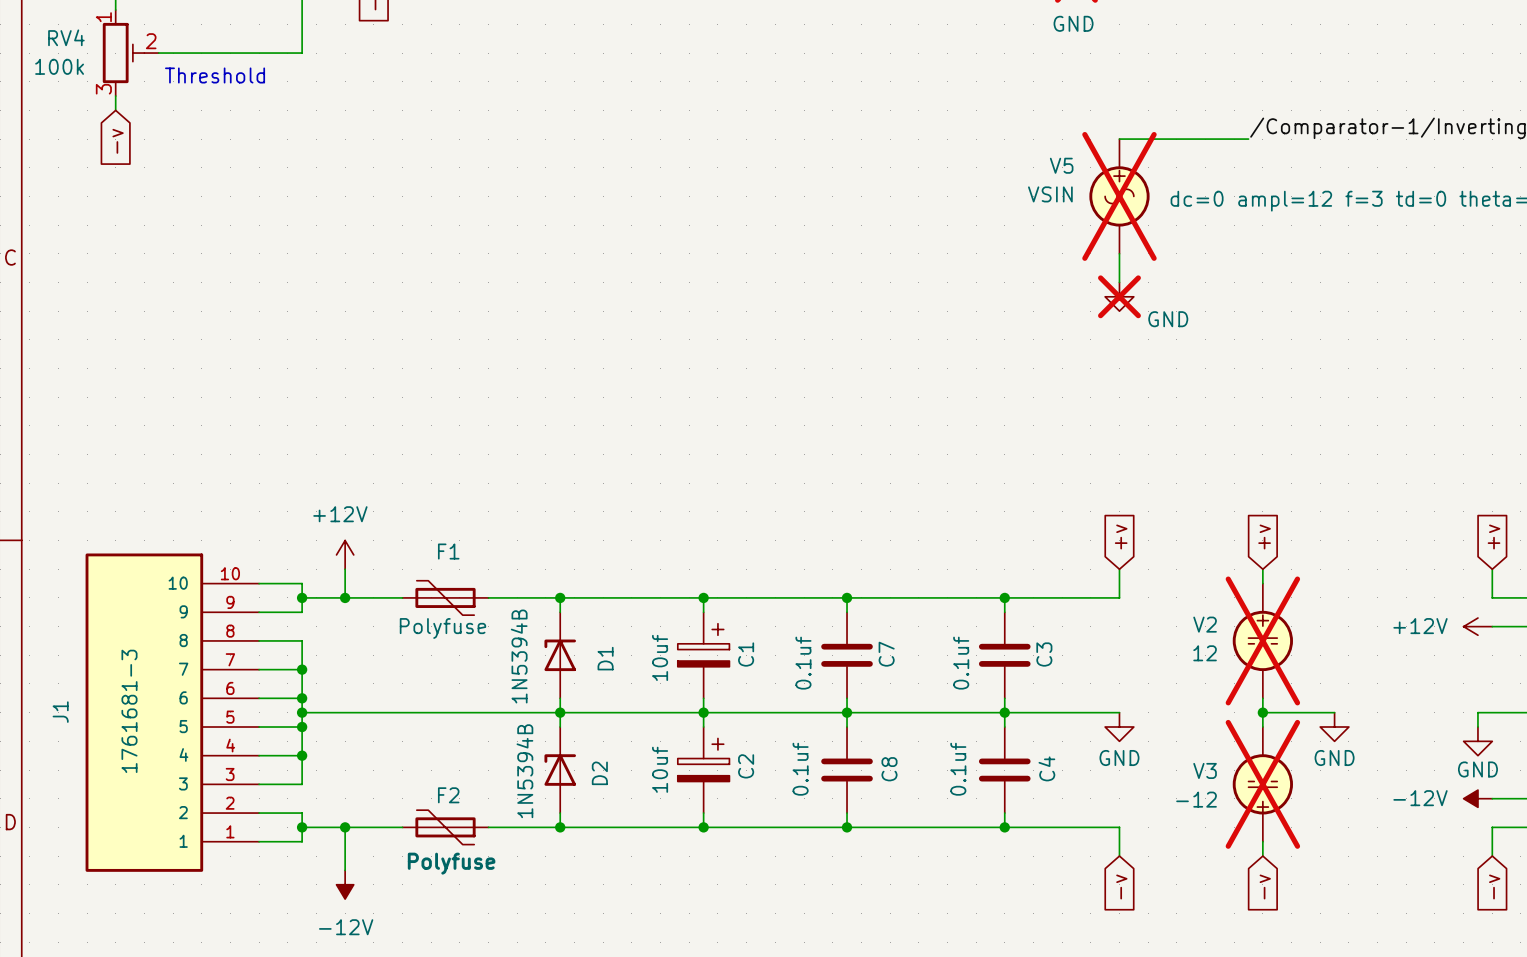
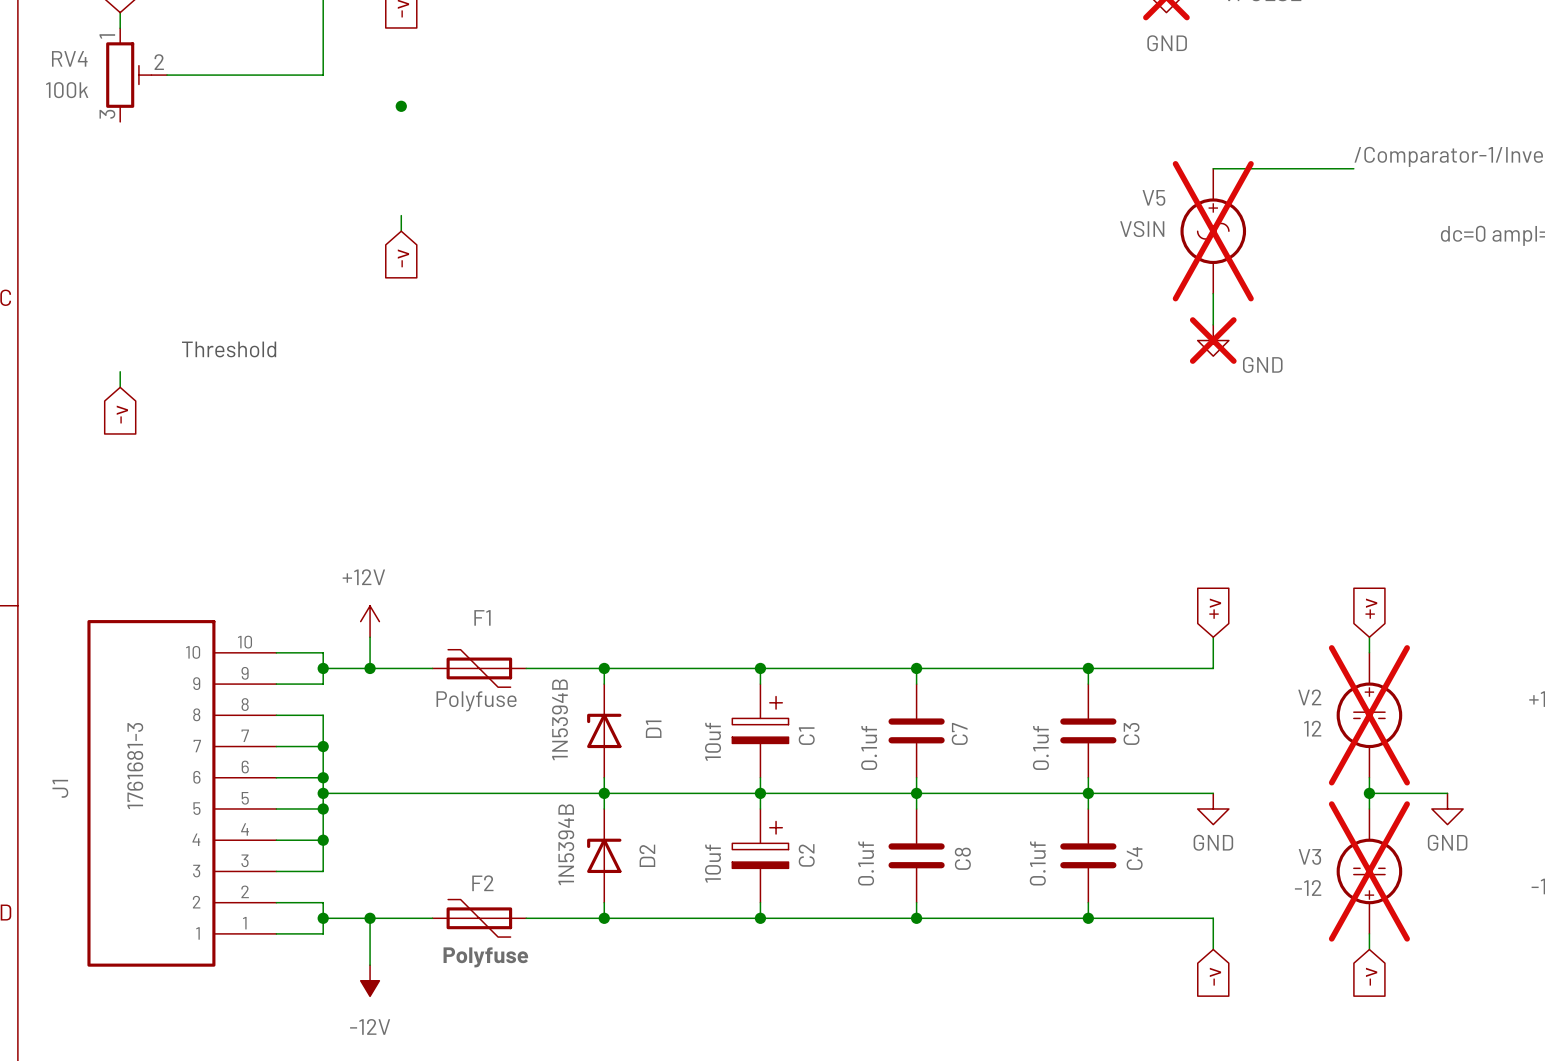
text position: Threshold (215, 75) -> Threshold (229, 349)
junction: none -> (401, 106)
wire: (115, 96) (115, 110) -> (120, 371) (120, 387)
global label: -v (118, 141) -> none
wire: none -> (401, 215) (401, 231)
global label: none -> -v (403, 258)
global label: none -> -v (122, 414)

